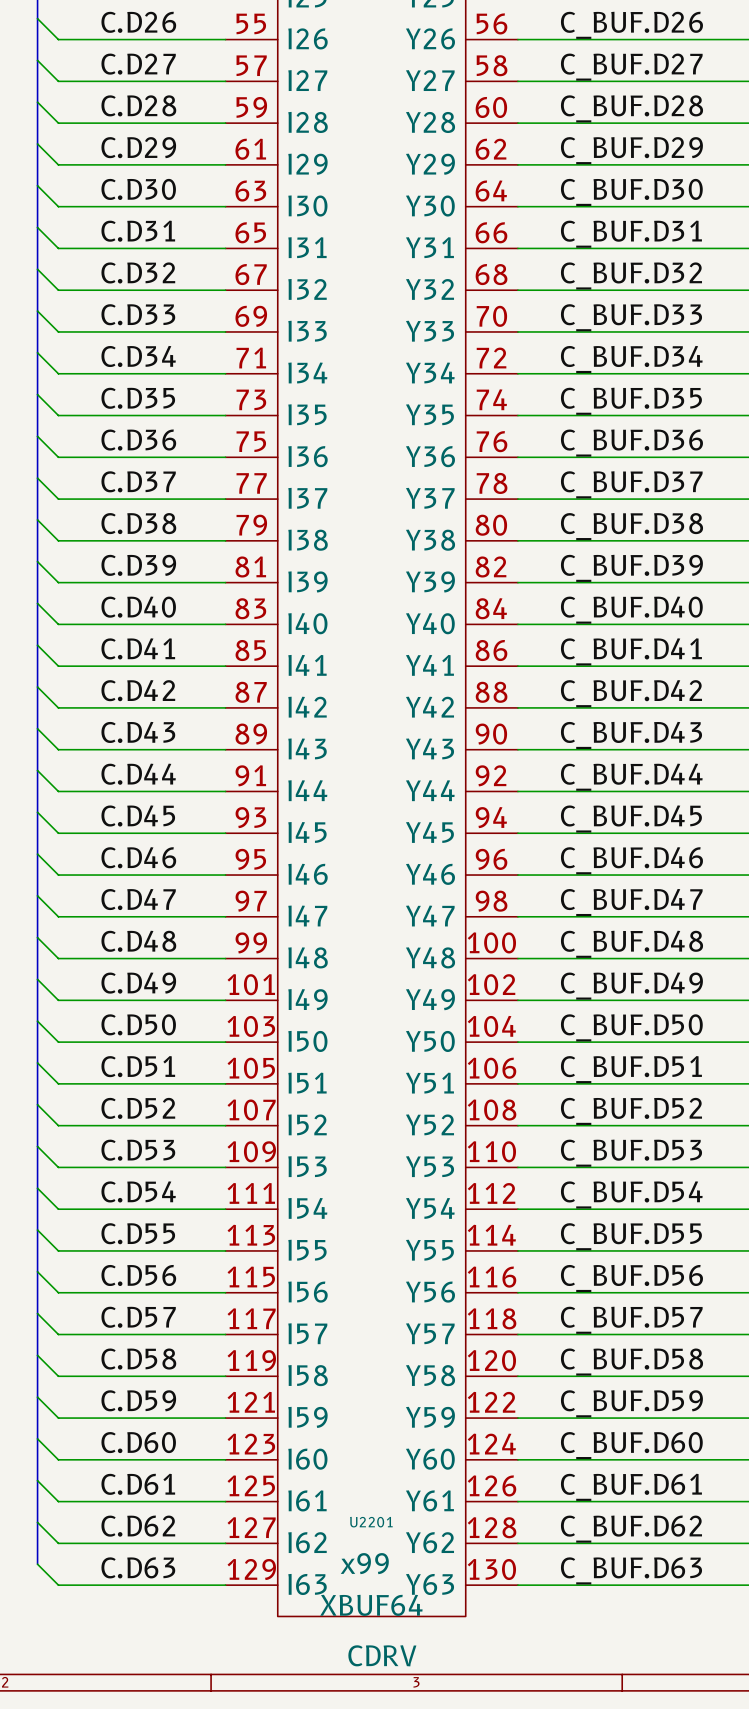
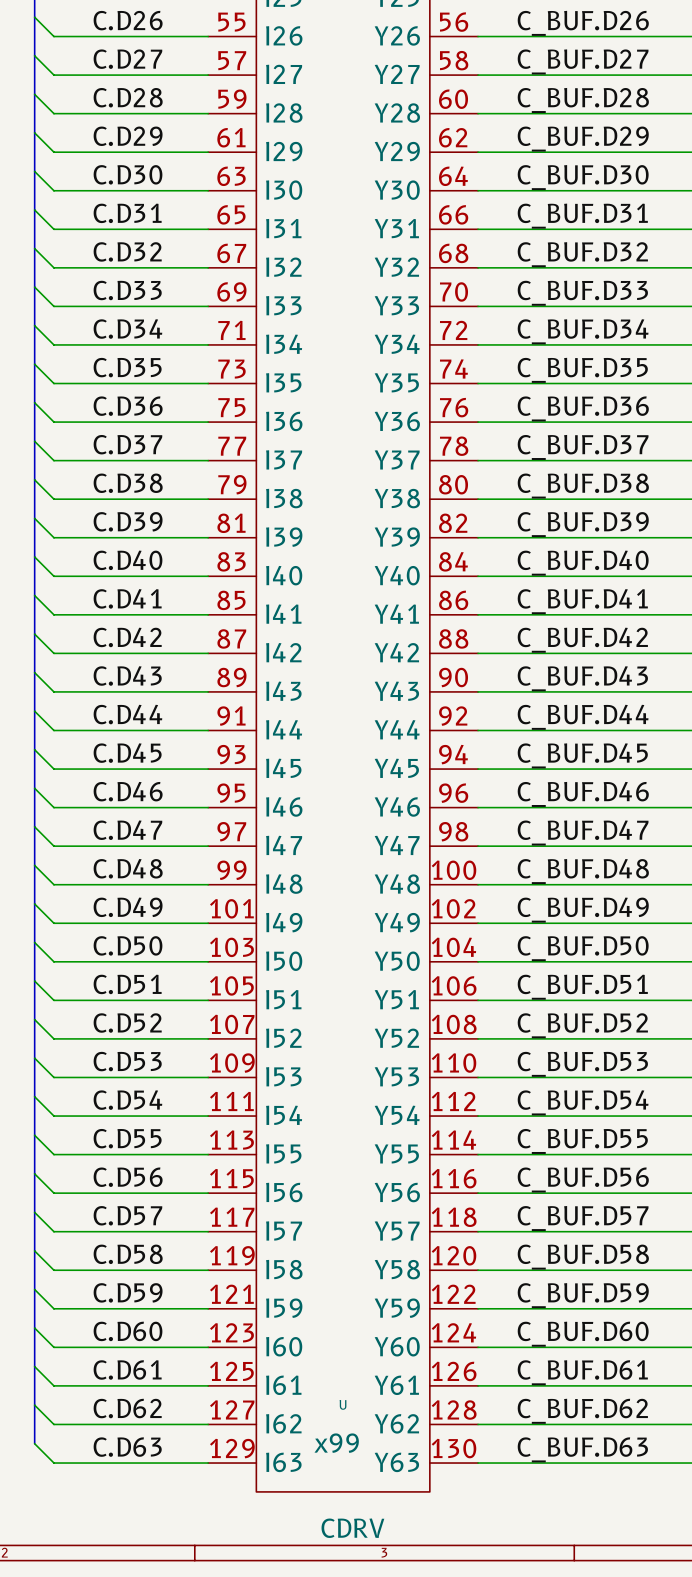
U2201 name: U2201 (371, 1522) -> U (343, 1404)
U2201 value: XBUF64 (371, 1605) -> none

